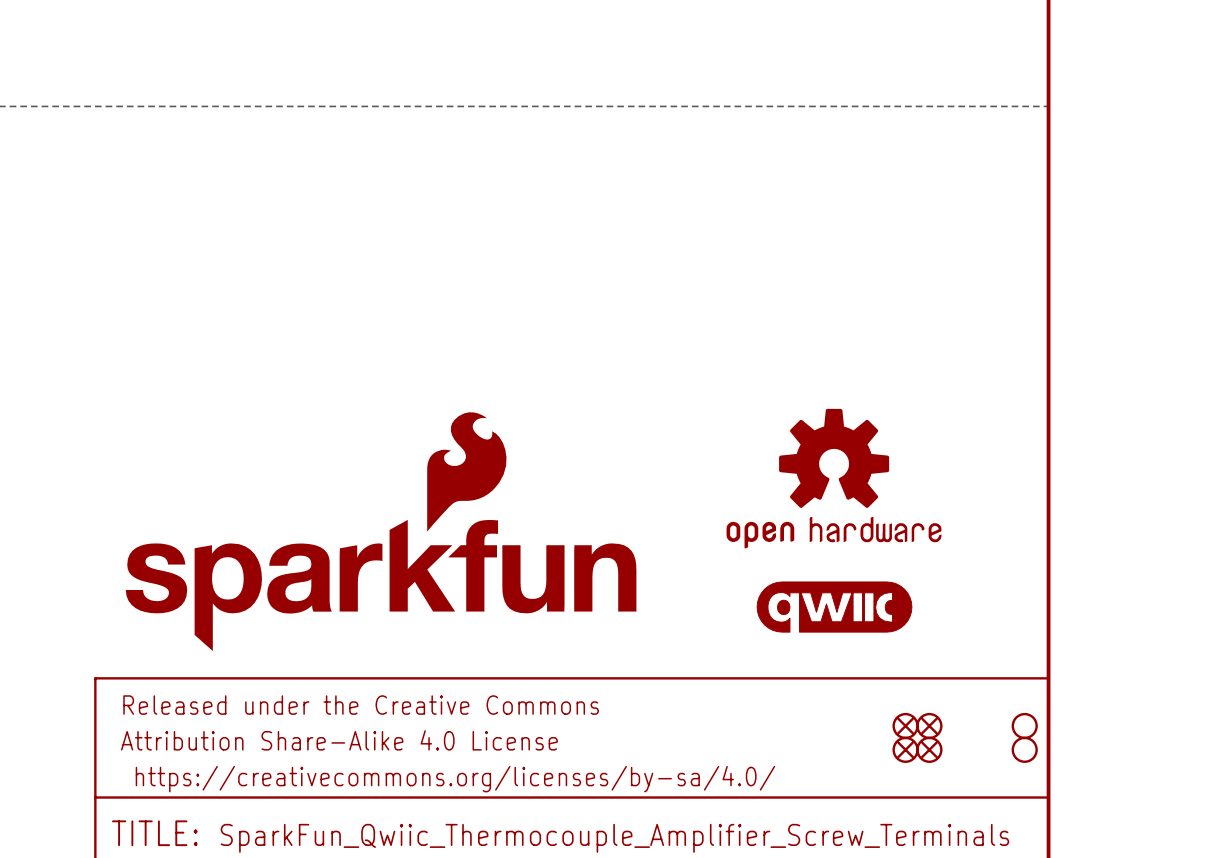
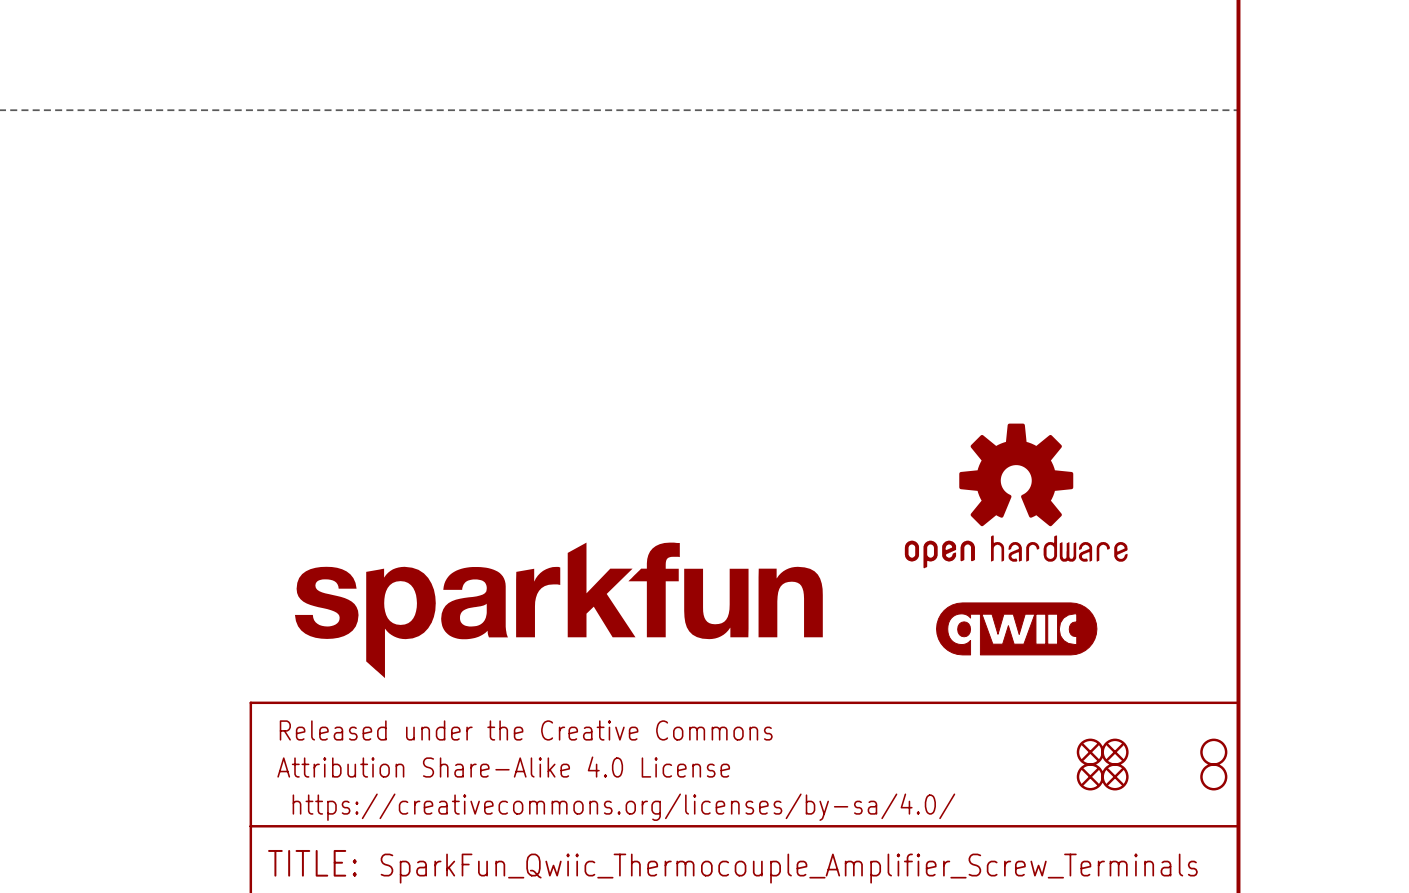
part: (381, 531) -> none
part: none -> (558, 610)

